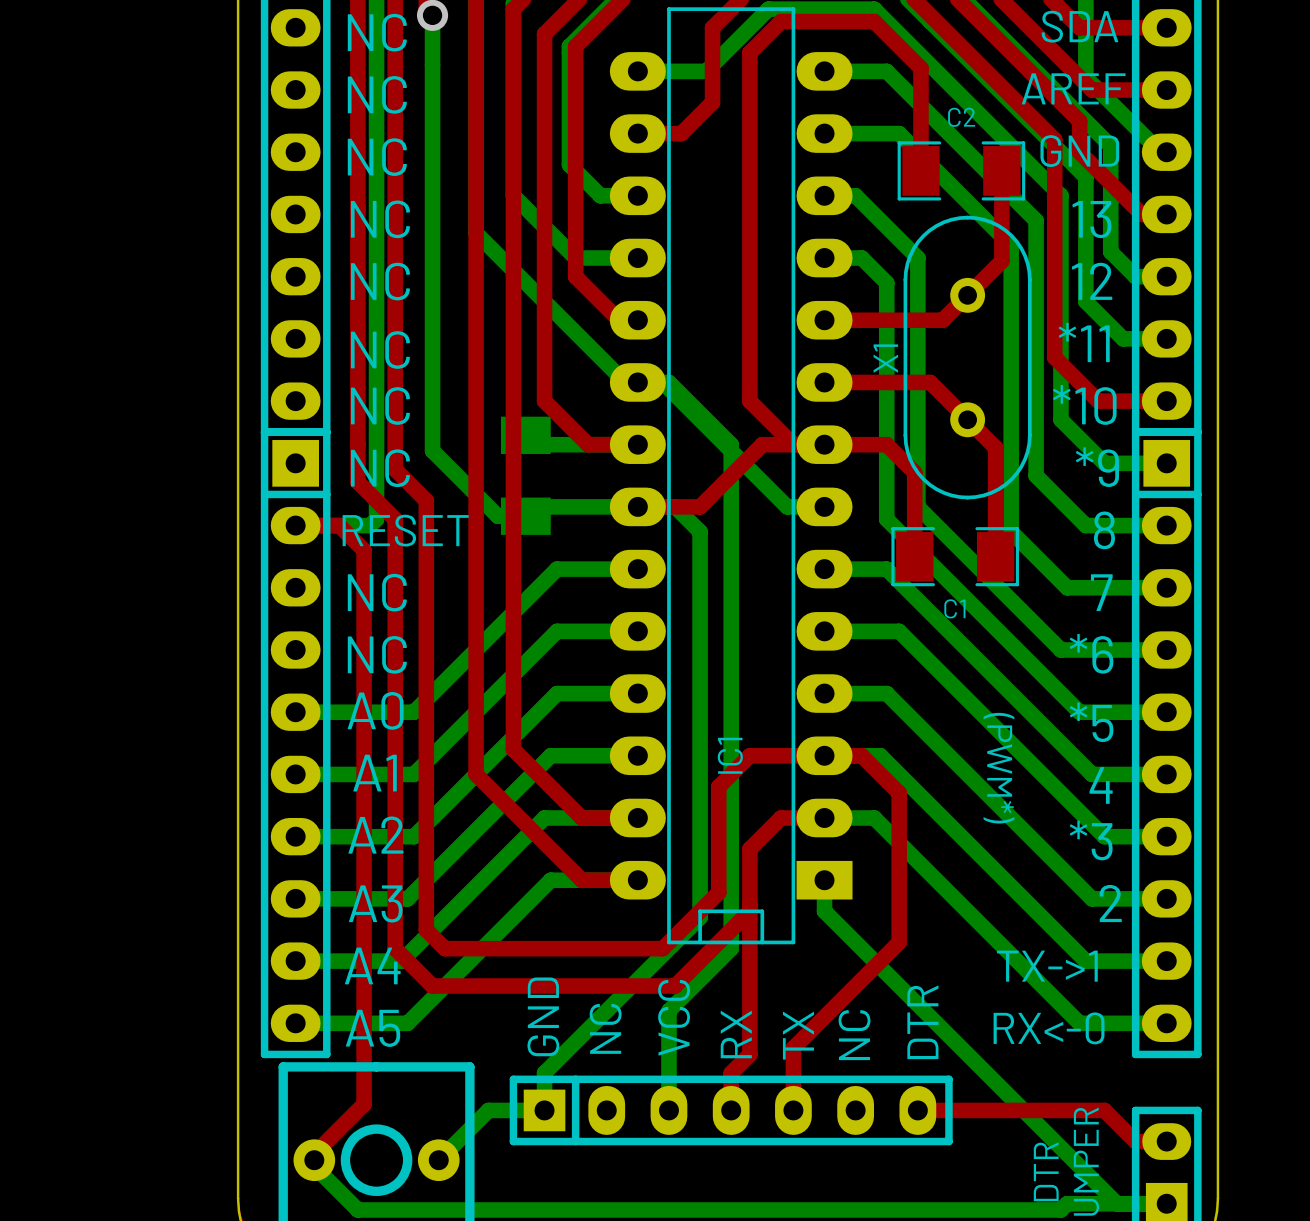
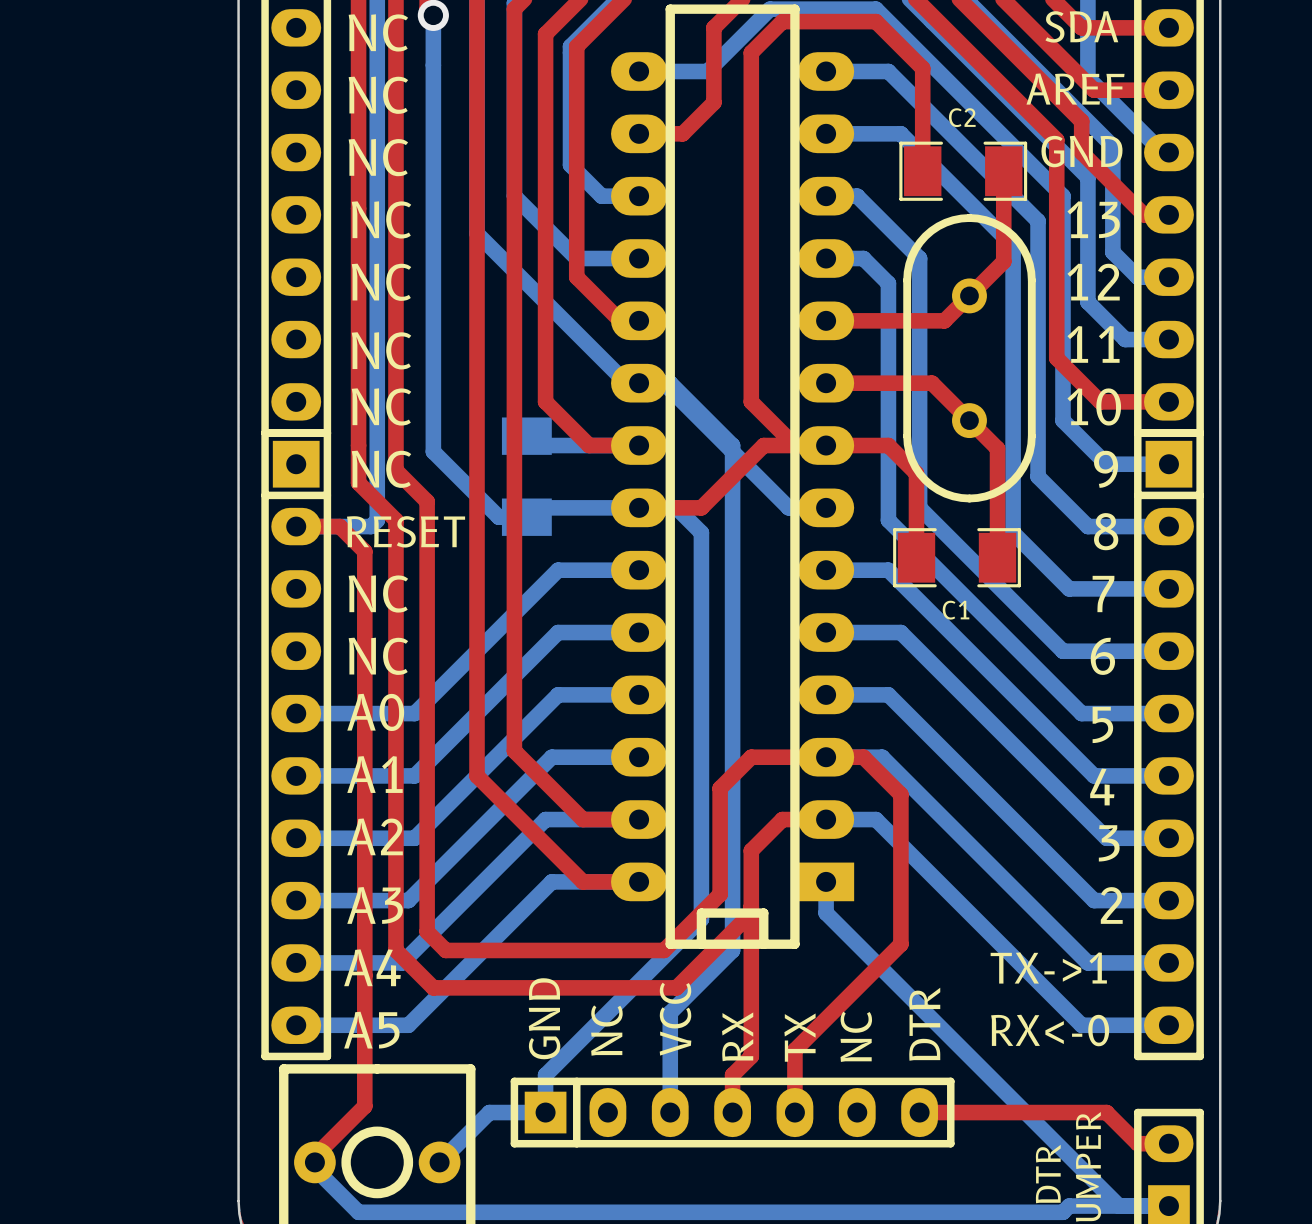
text: *11 (1084, 342) -> 11 (1093, 344)
X1: (967, 357) -> none
part: none -> (969, 358)
text: *10 (1084, 405) -> 10 (1094, 406)
text: *9 (1097, 467) -> 9 (1106, 469)
IC1: (731, 475) -> none
part: none -> (732, 476)
text: *6 (1091, 653) -> 6 (1102, 656)
text: *5 (1091, 722) -> 5 (1102, 724)
text: (PWM*) (998, 768) -> none
text: *3 (1091, 840) -> 3 (1109, 843)

